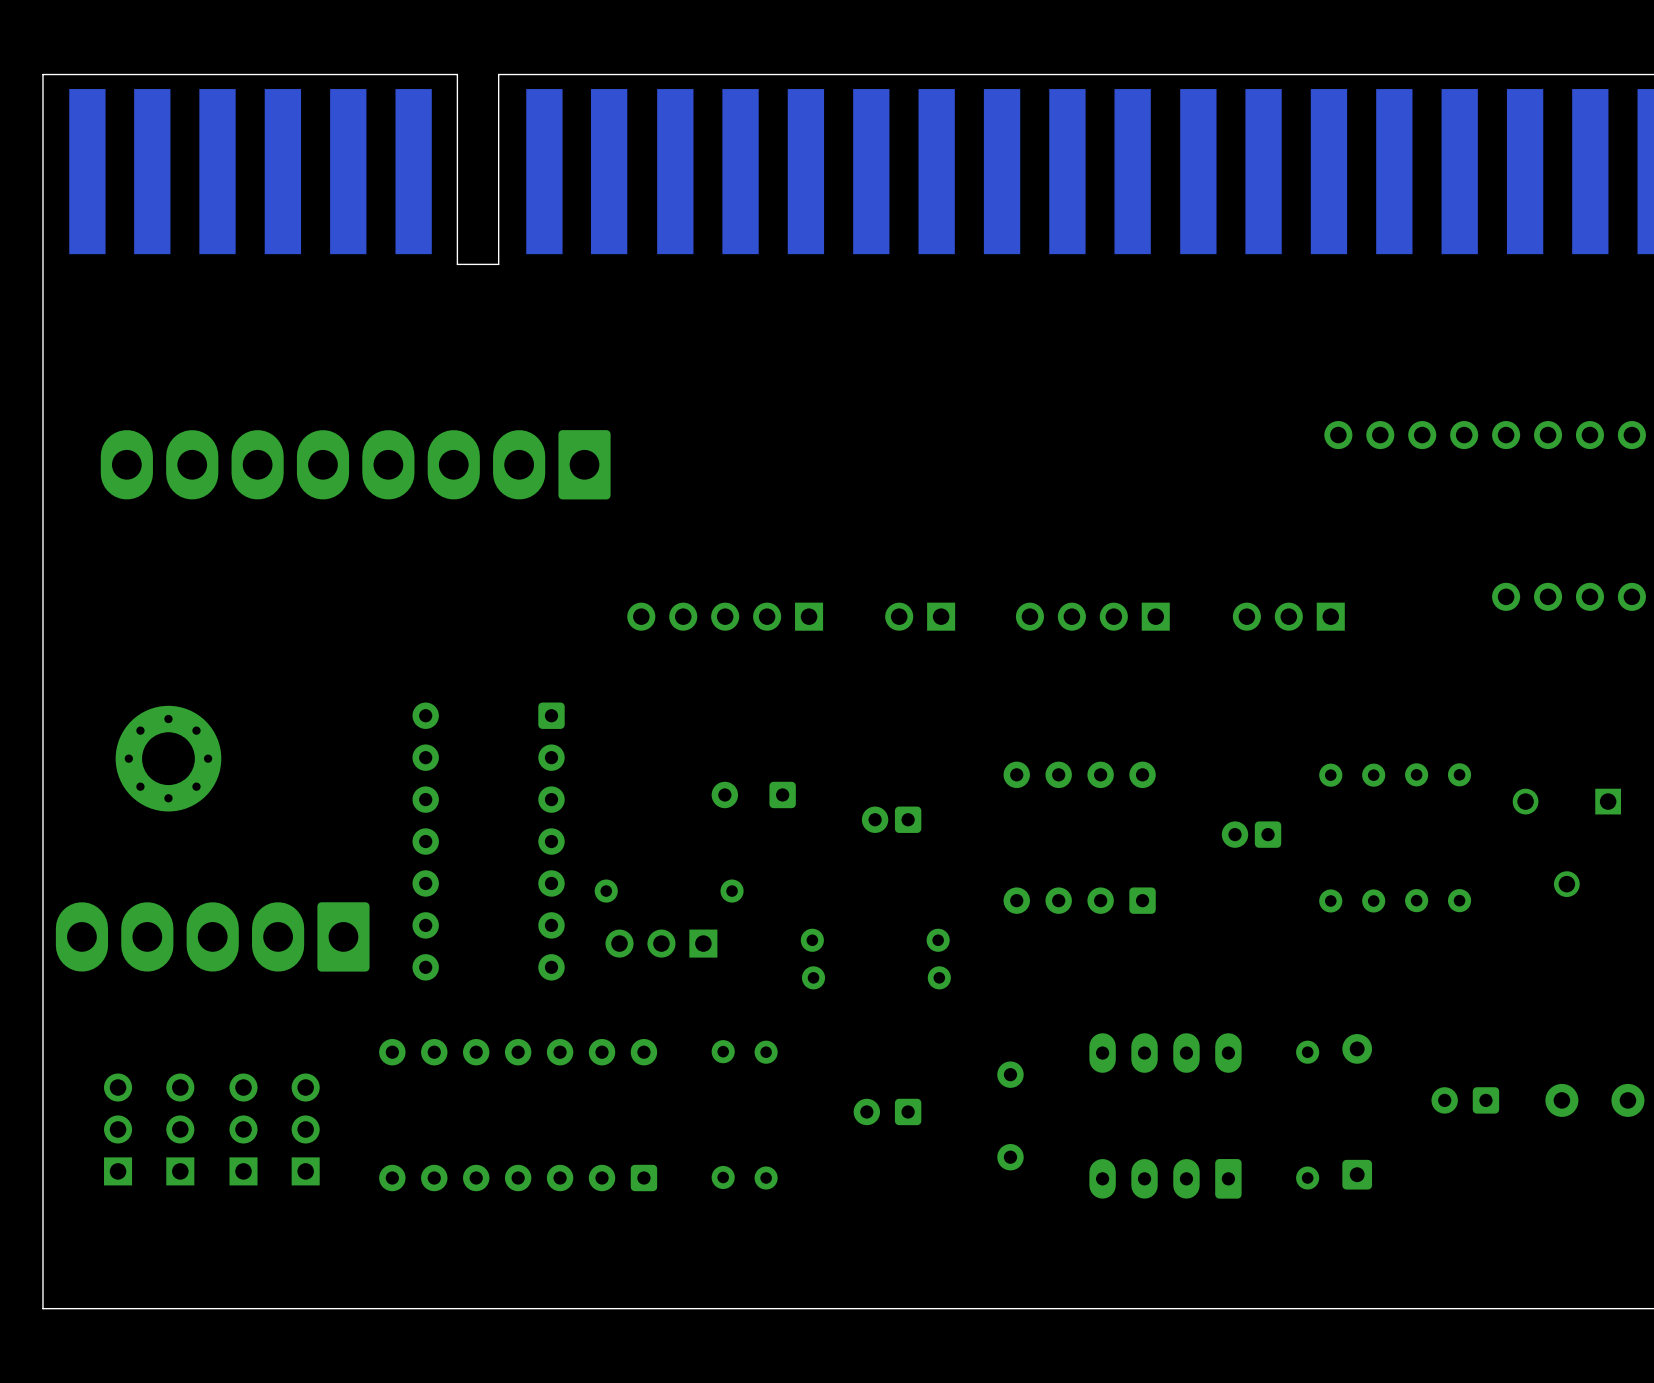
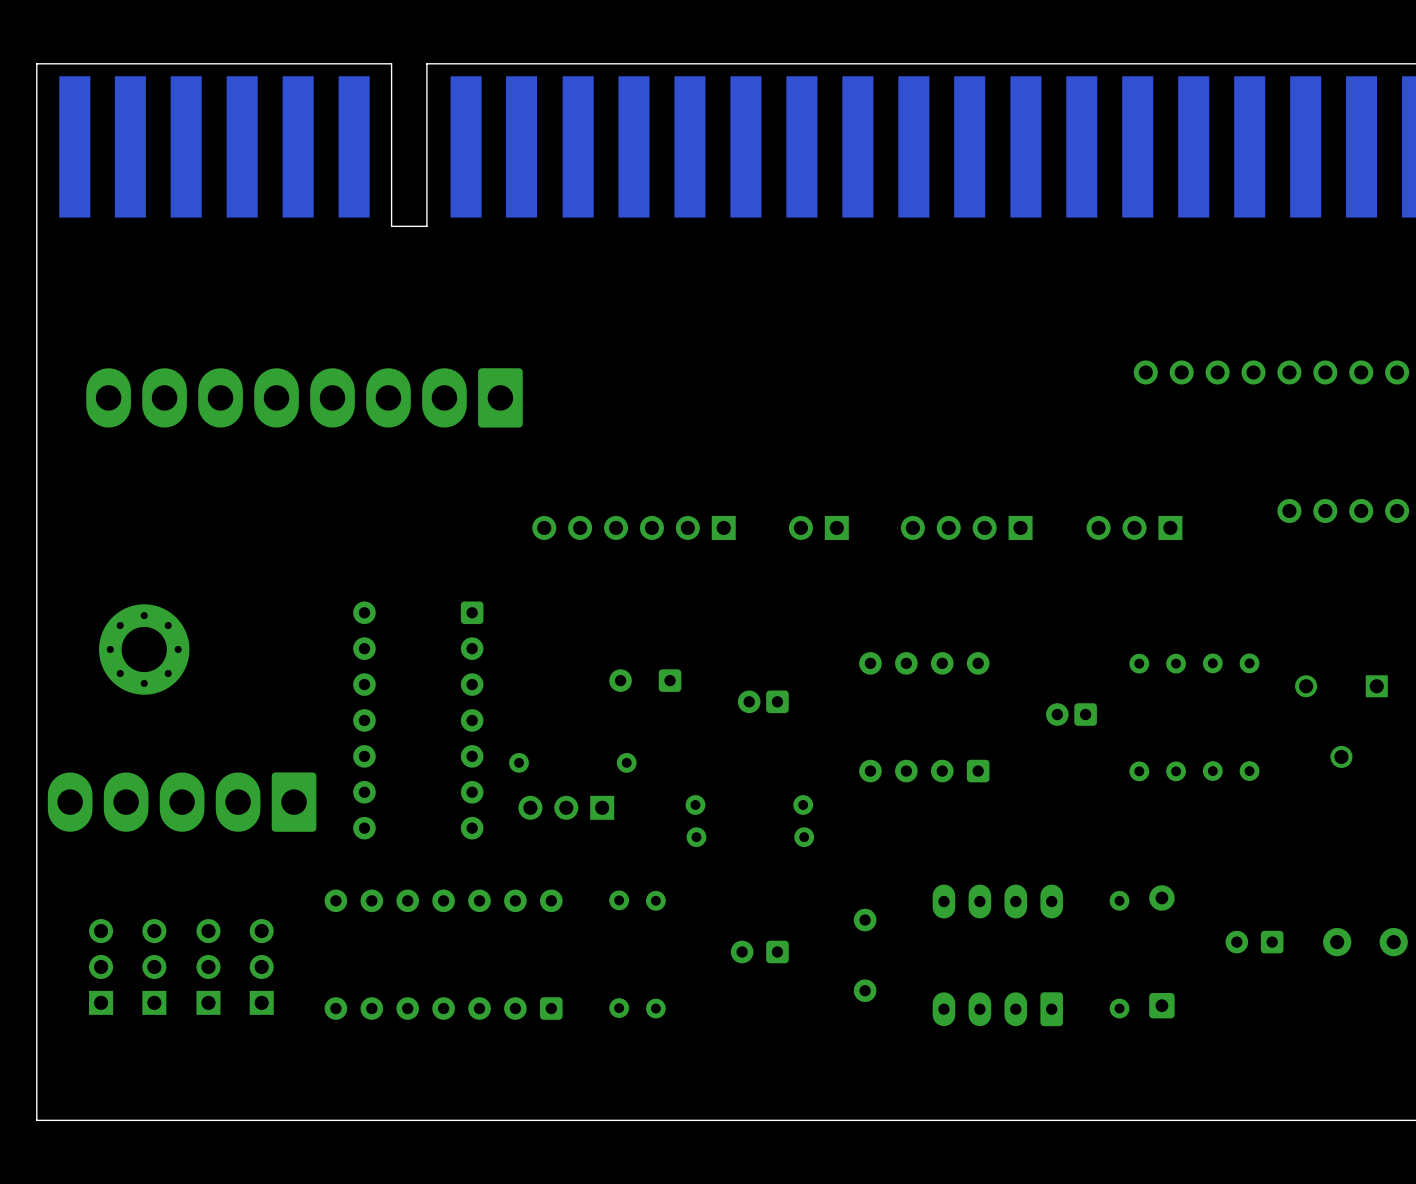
part footprint: [627, 602, 824, 631] -> [532, 515, 736, 540]
part position: (920, 616) -> (818, 527)
part position: (1092, 616) -> (966, 527)
part position: (1288, 616) -> (1134, 527)

